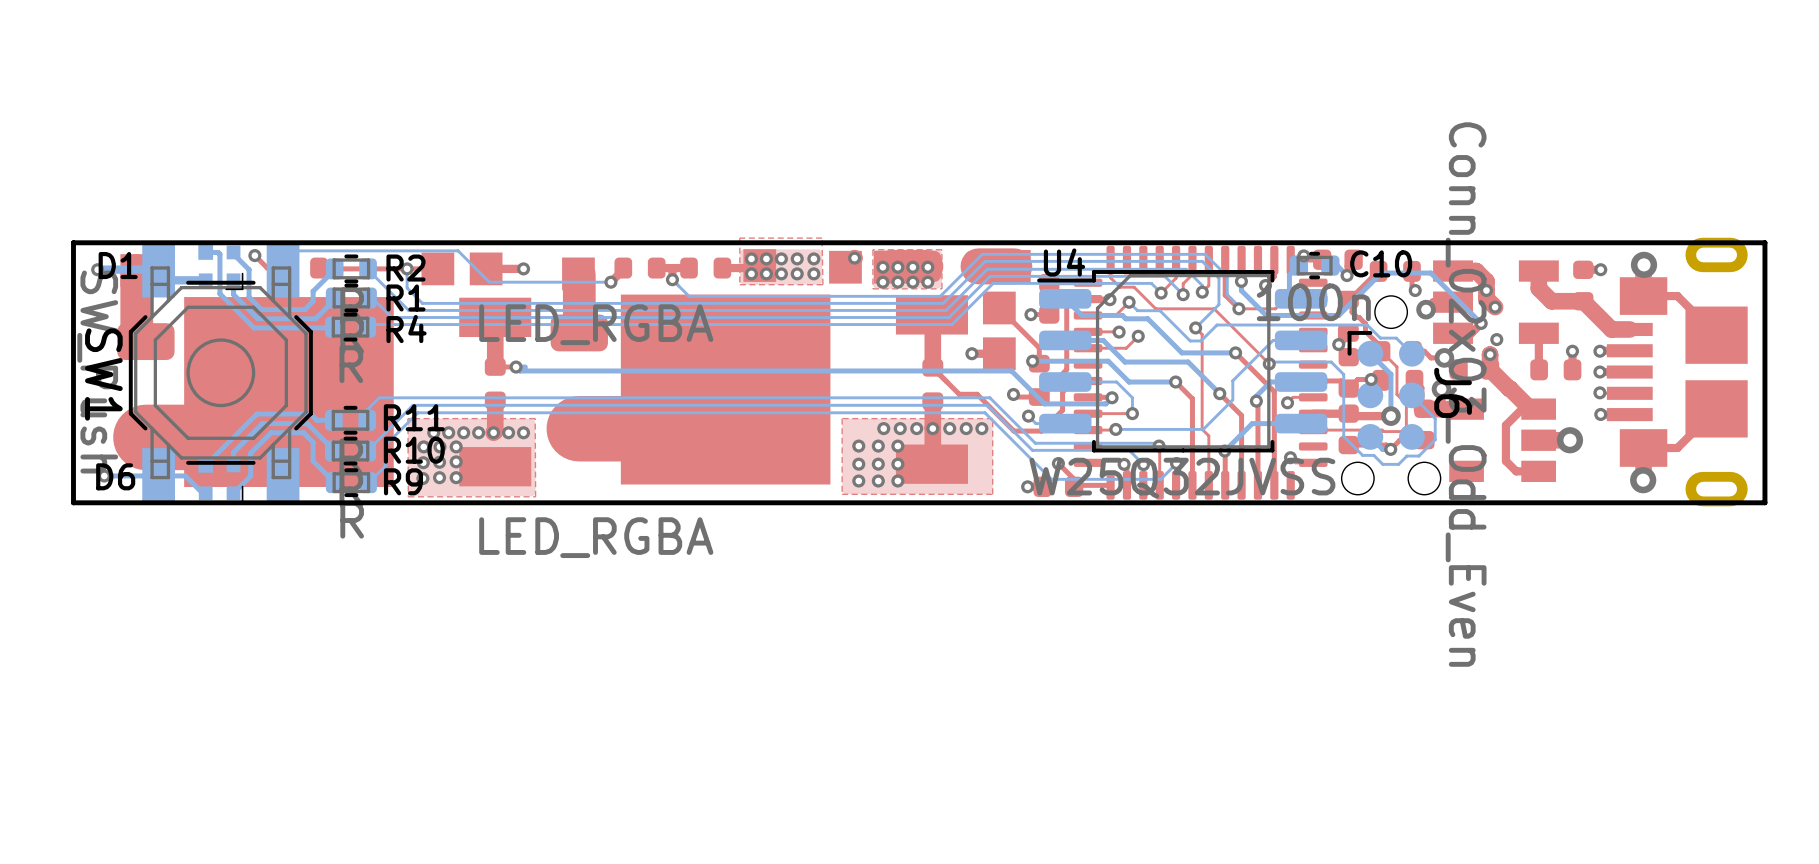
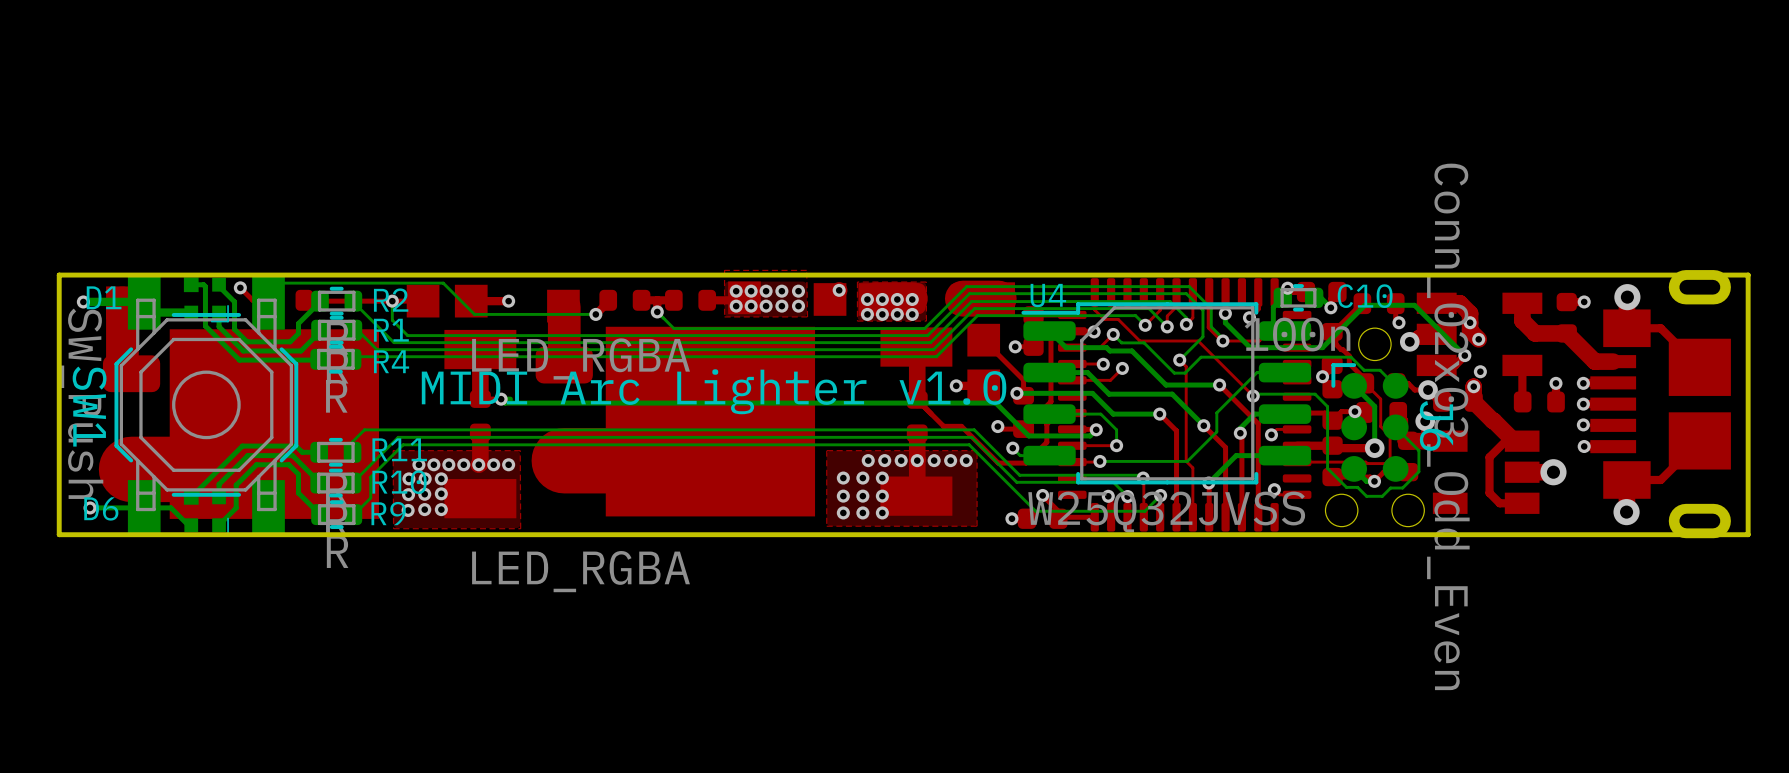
text: none -> MIDI Arc Lighter v1.0 (714, 391)

